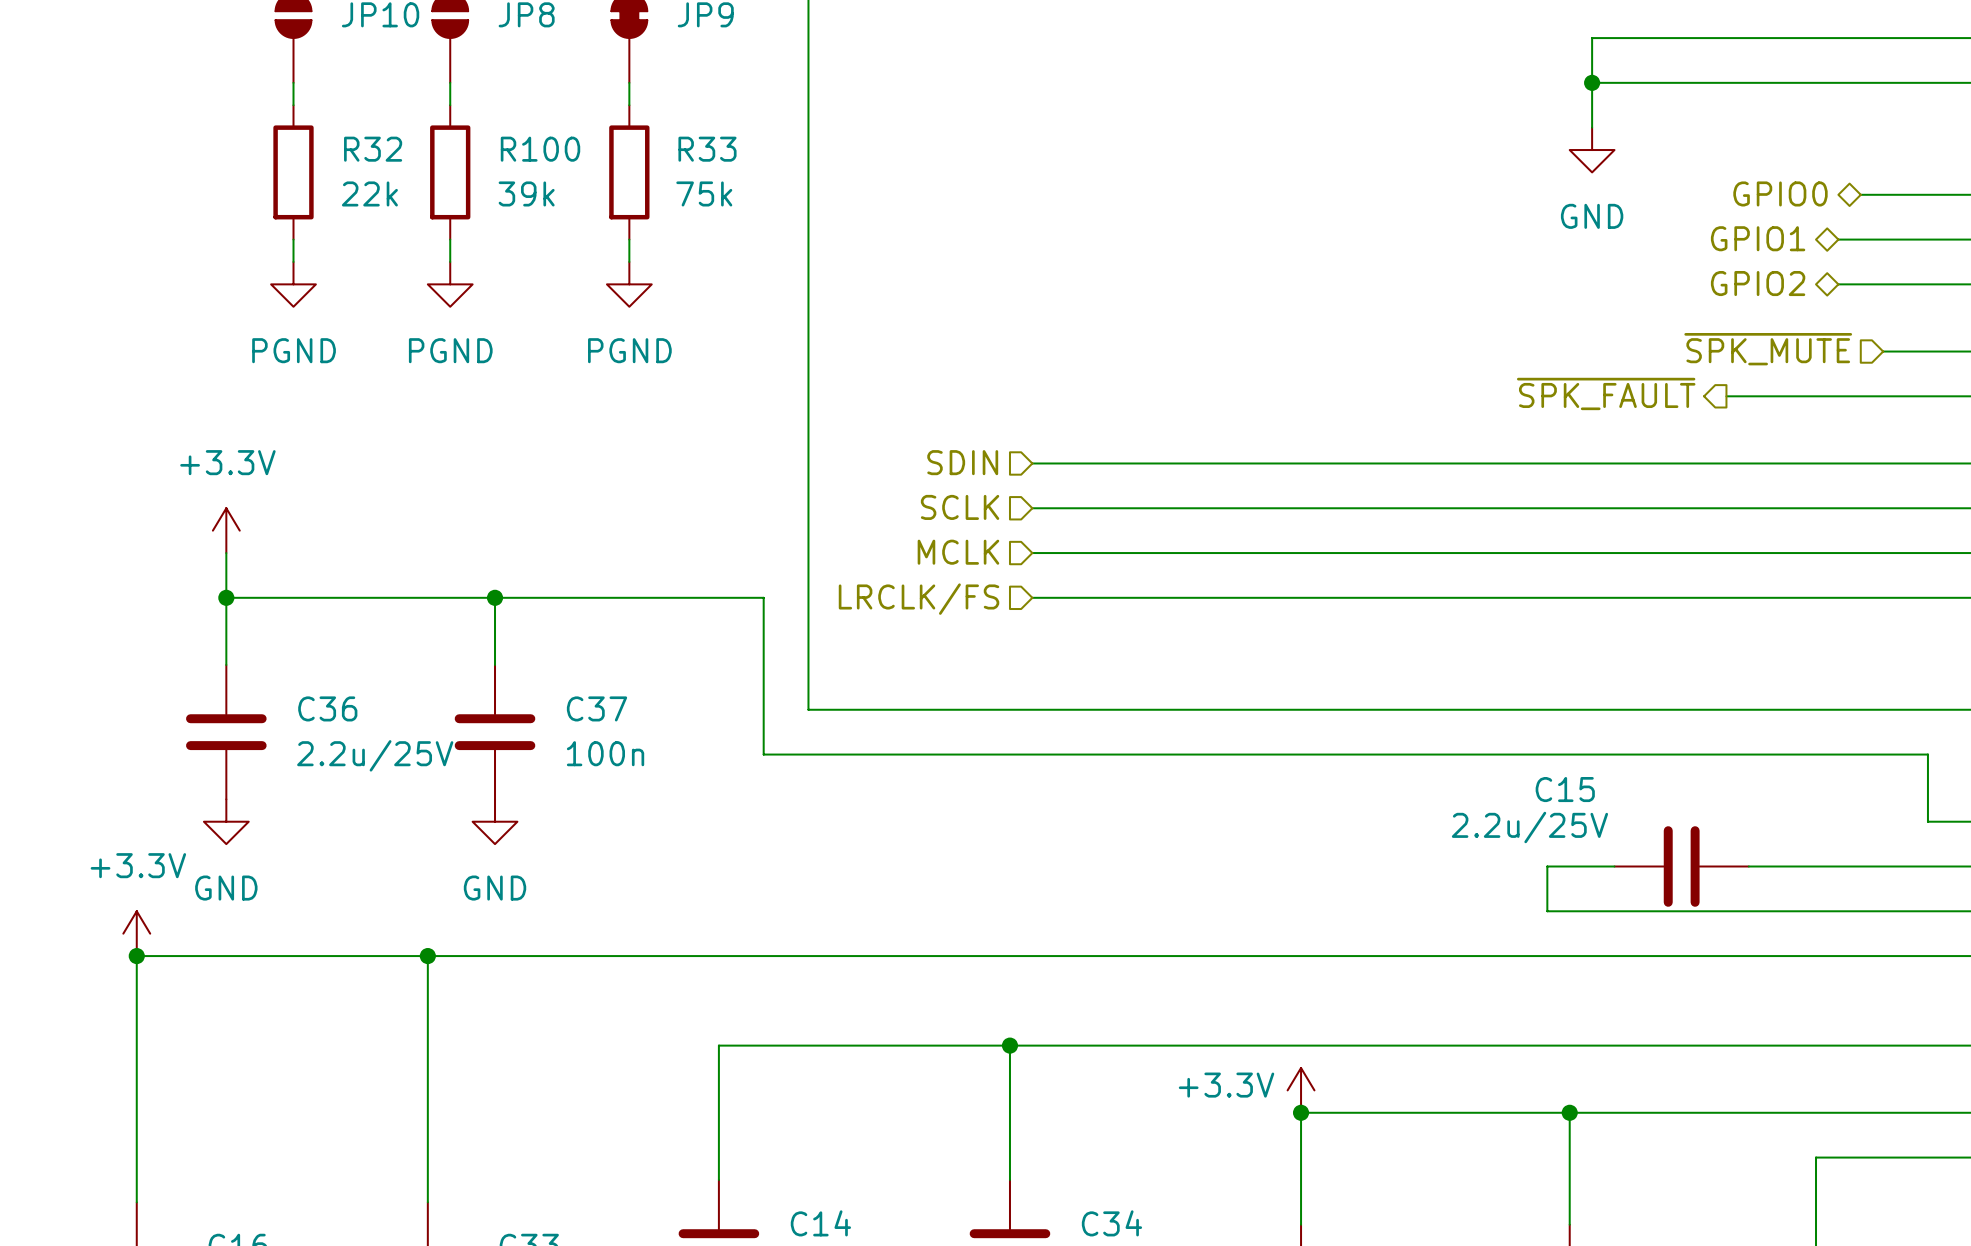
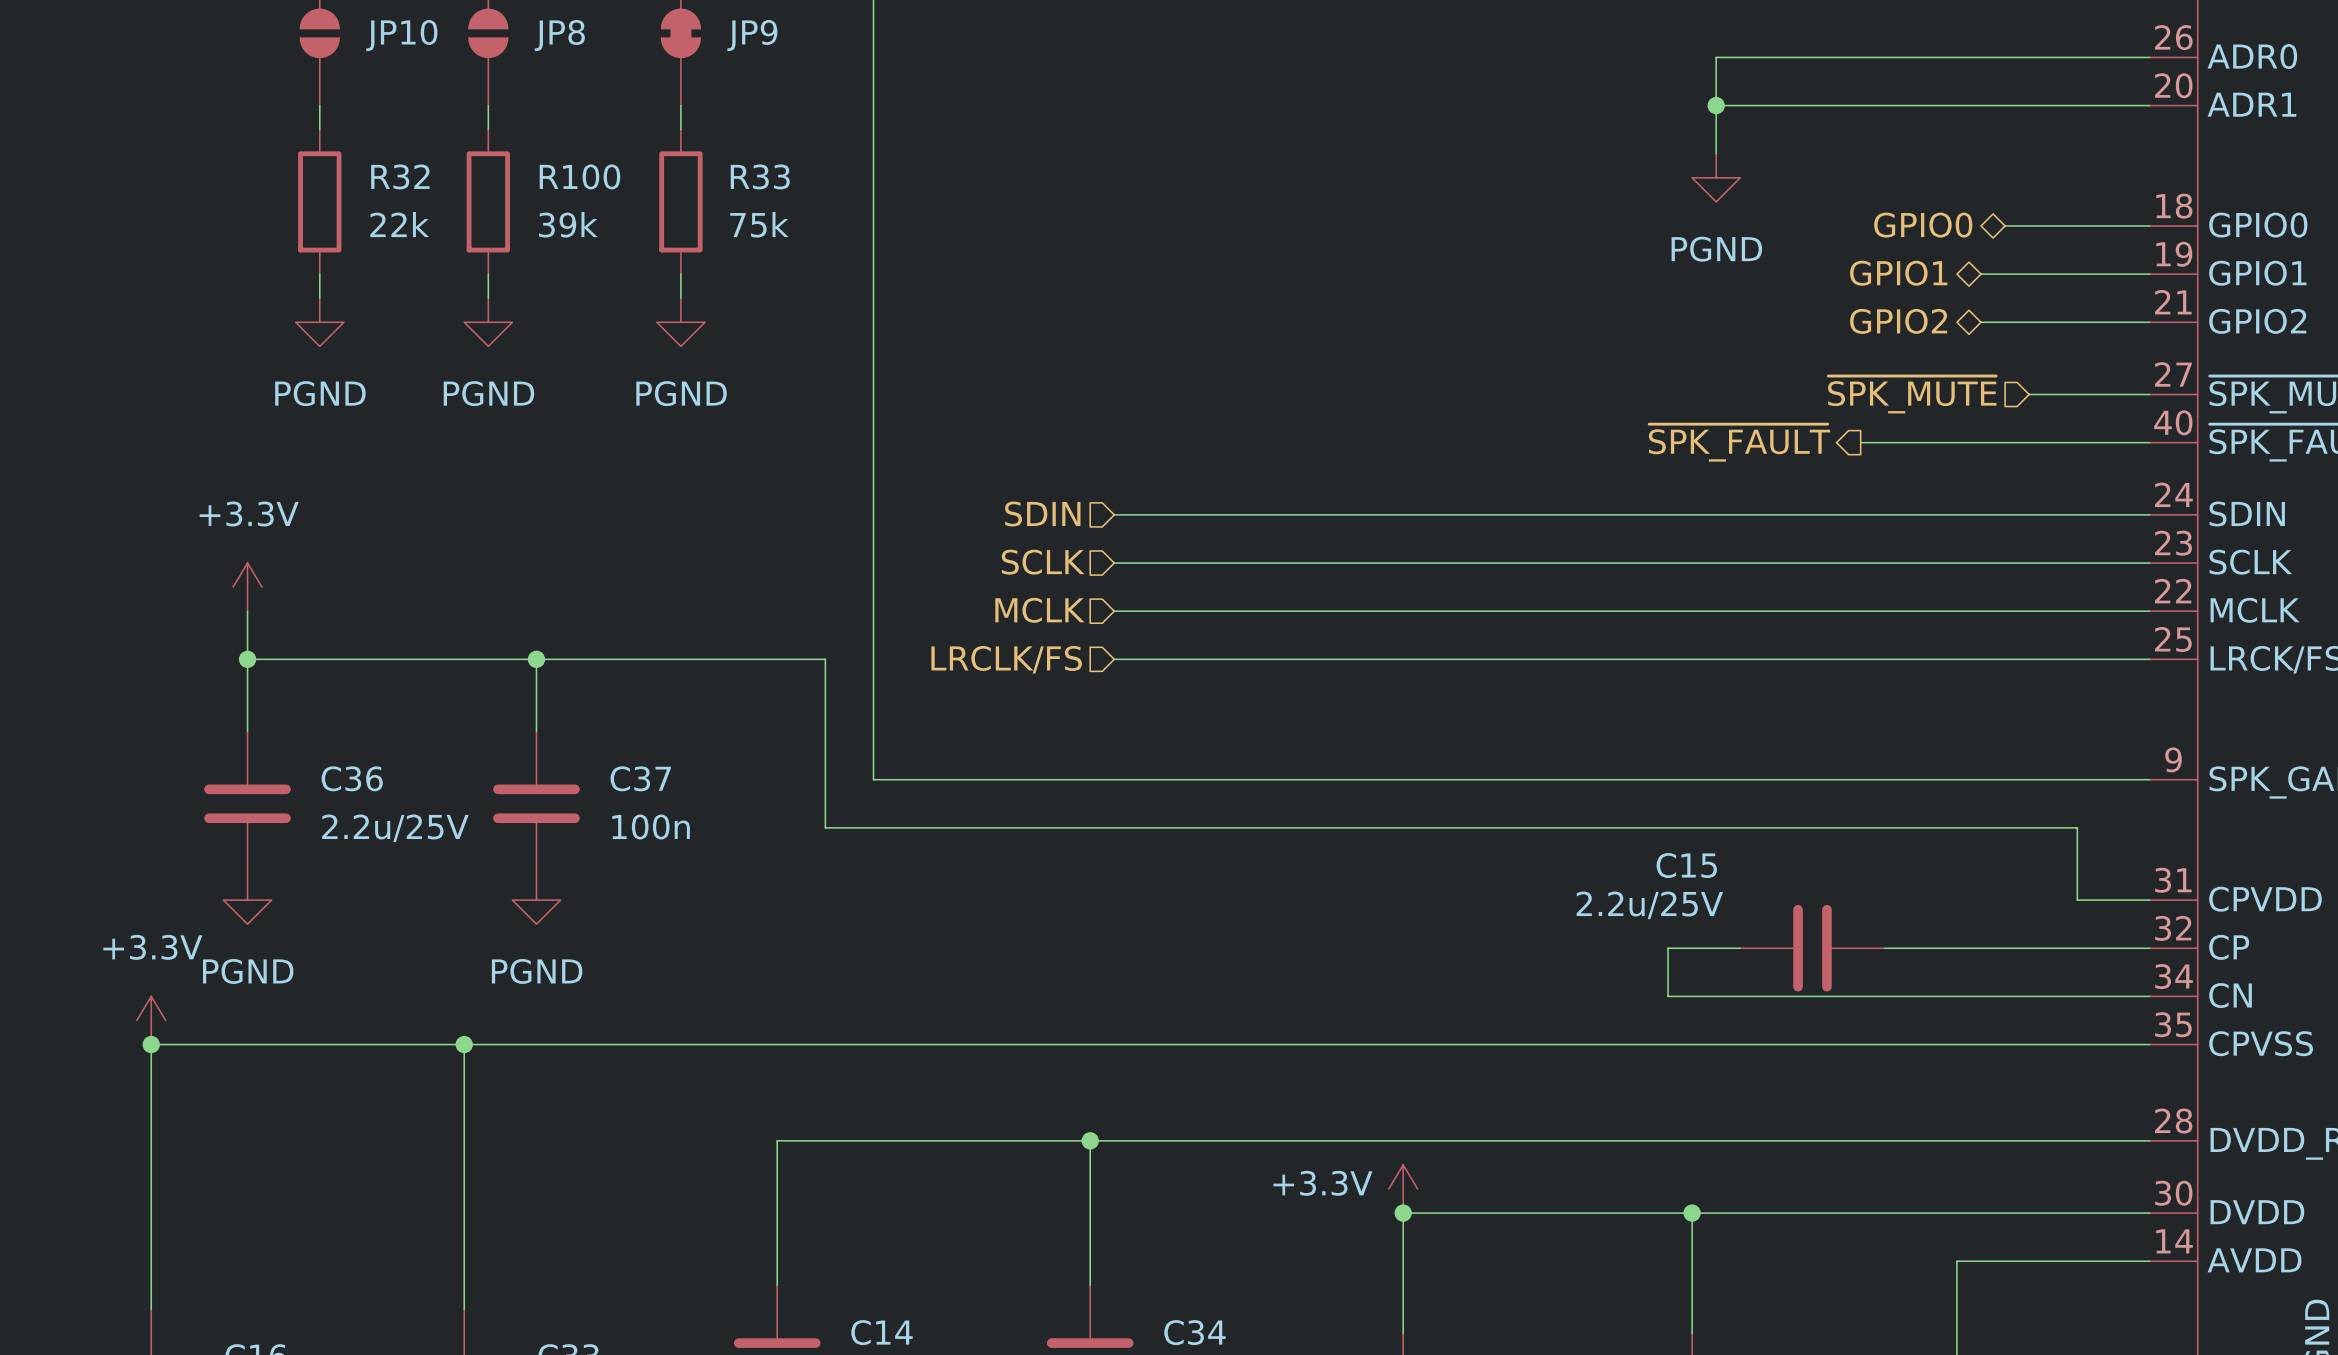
power symbol: GND (1592, 150) -> PGND (1716, 177)
power symbol: GND (226, 821) -> PGND (247, 900)
power symbol: GND (495, 821) -> PGND (536, 900)

